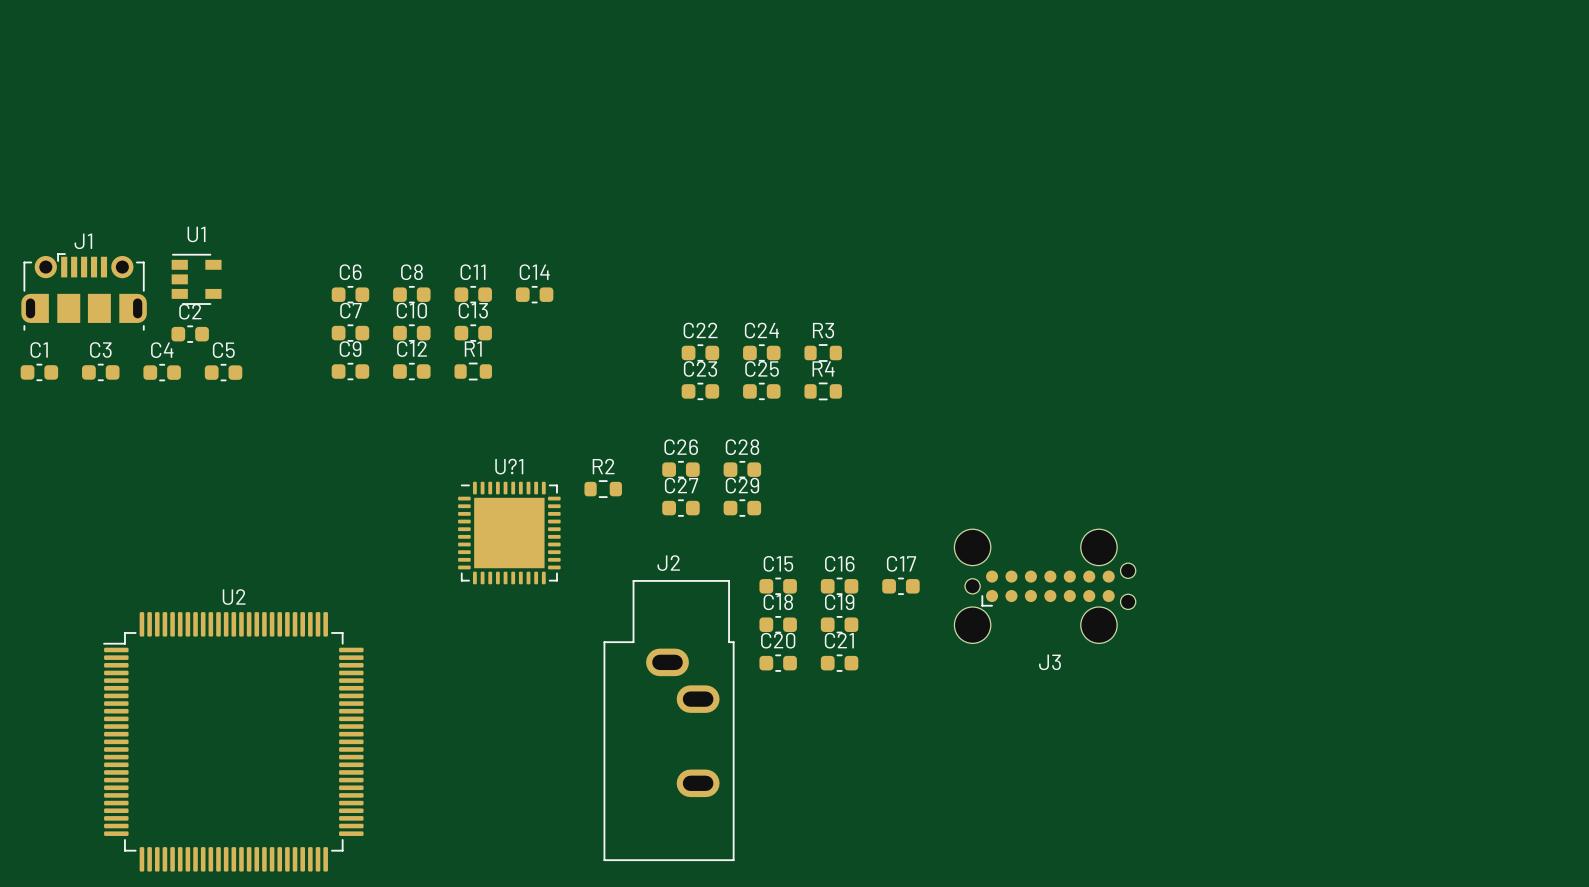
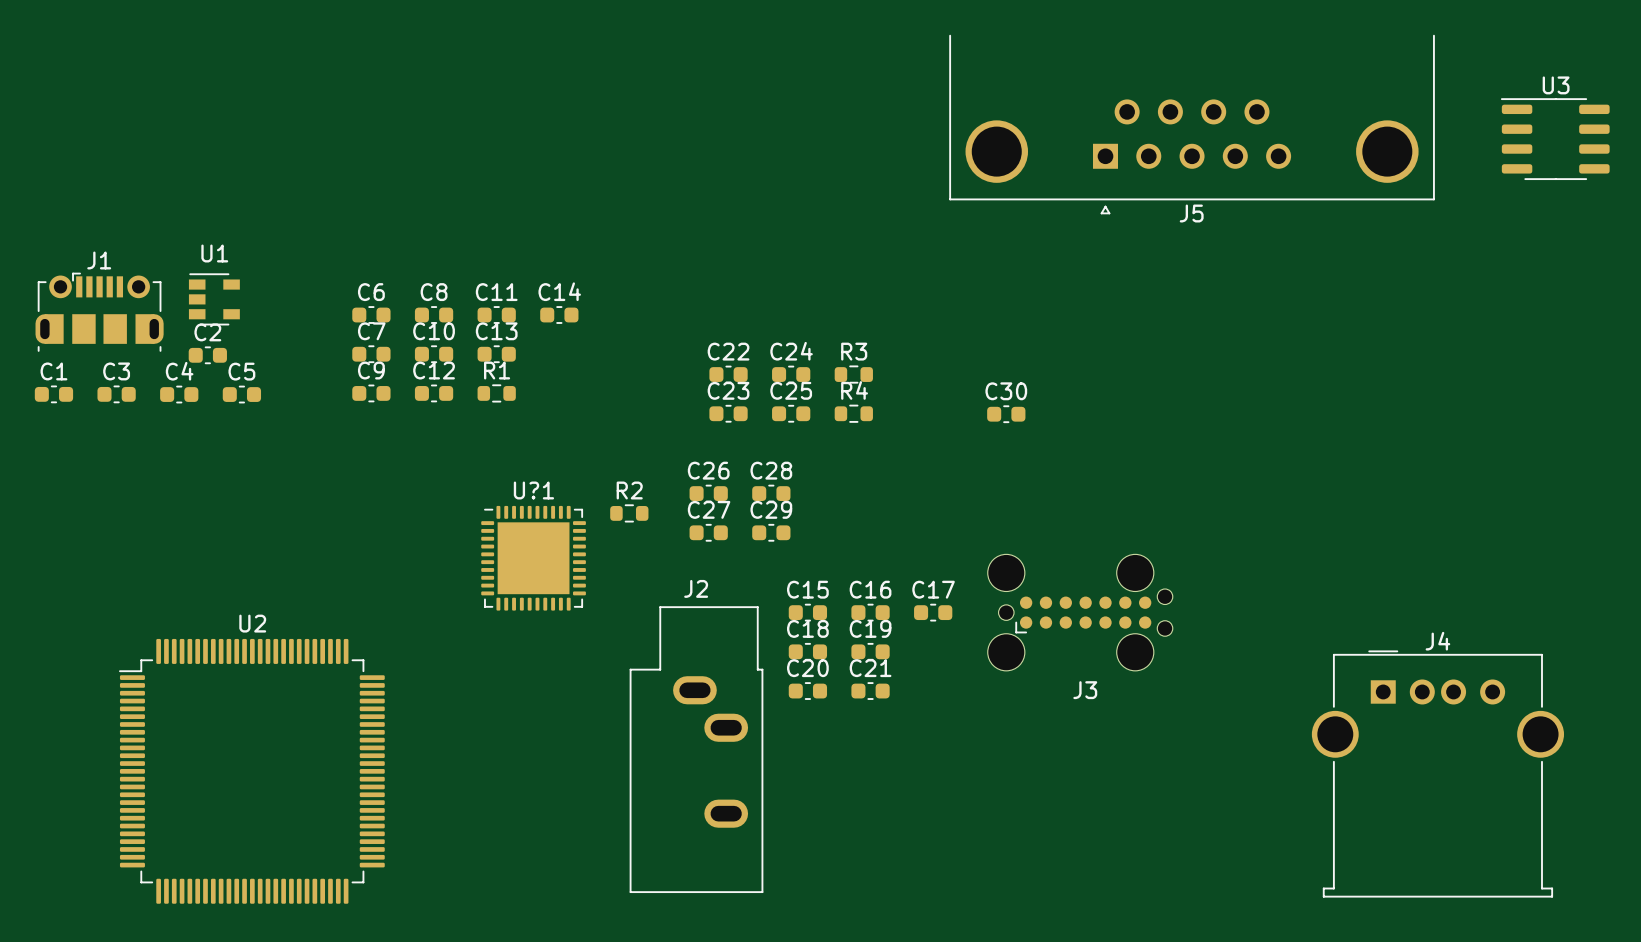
J5: none -> (1192, 124)
U3: none -> (1555, 139)
C30: none -> (1006, 414)
J4: none -> (1437, 774)

